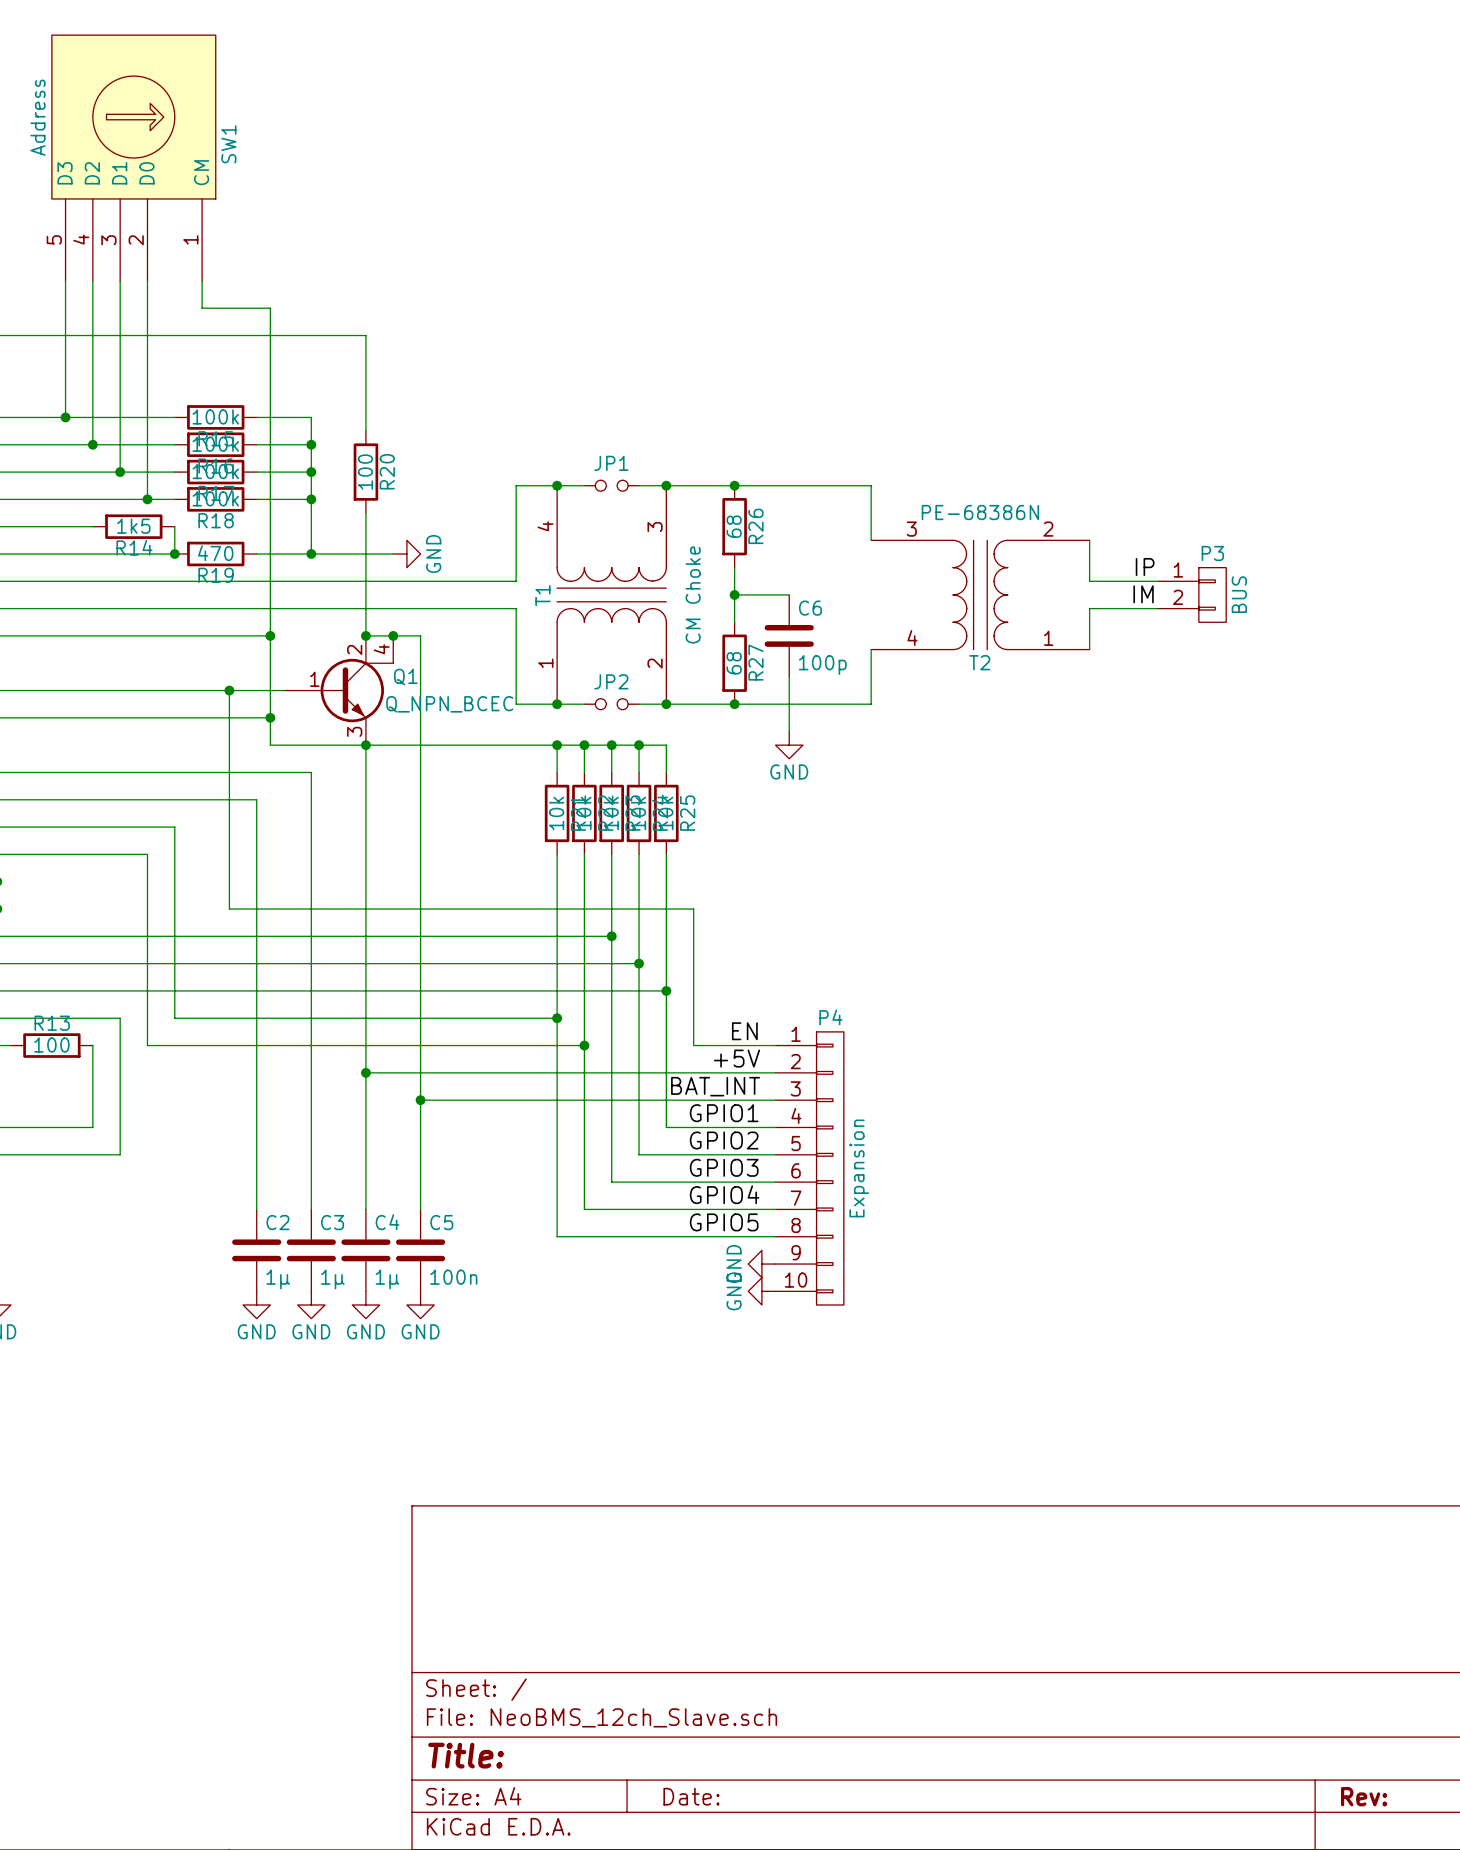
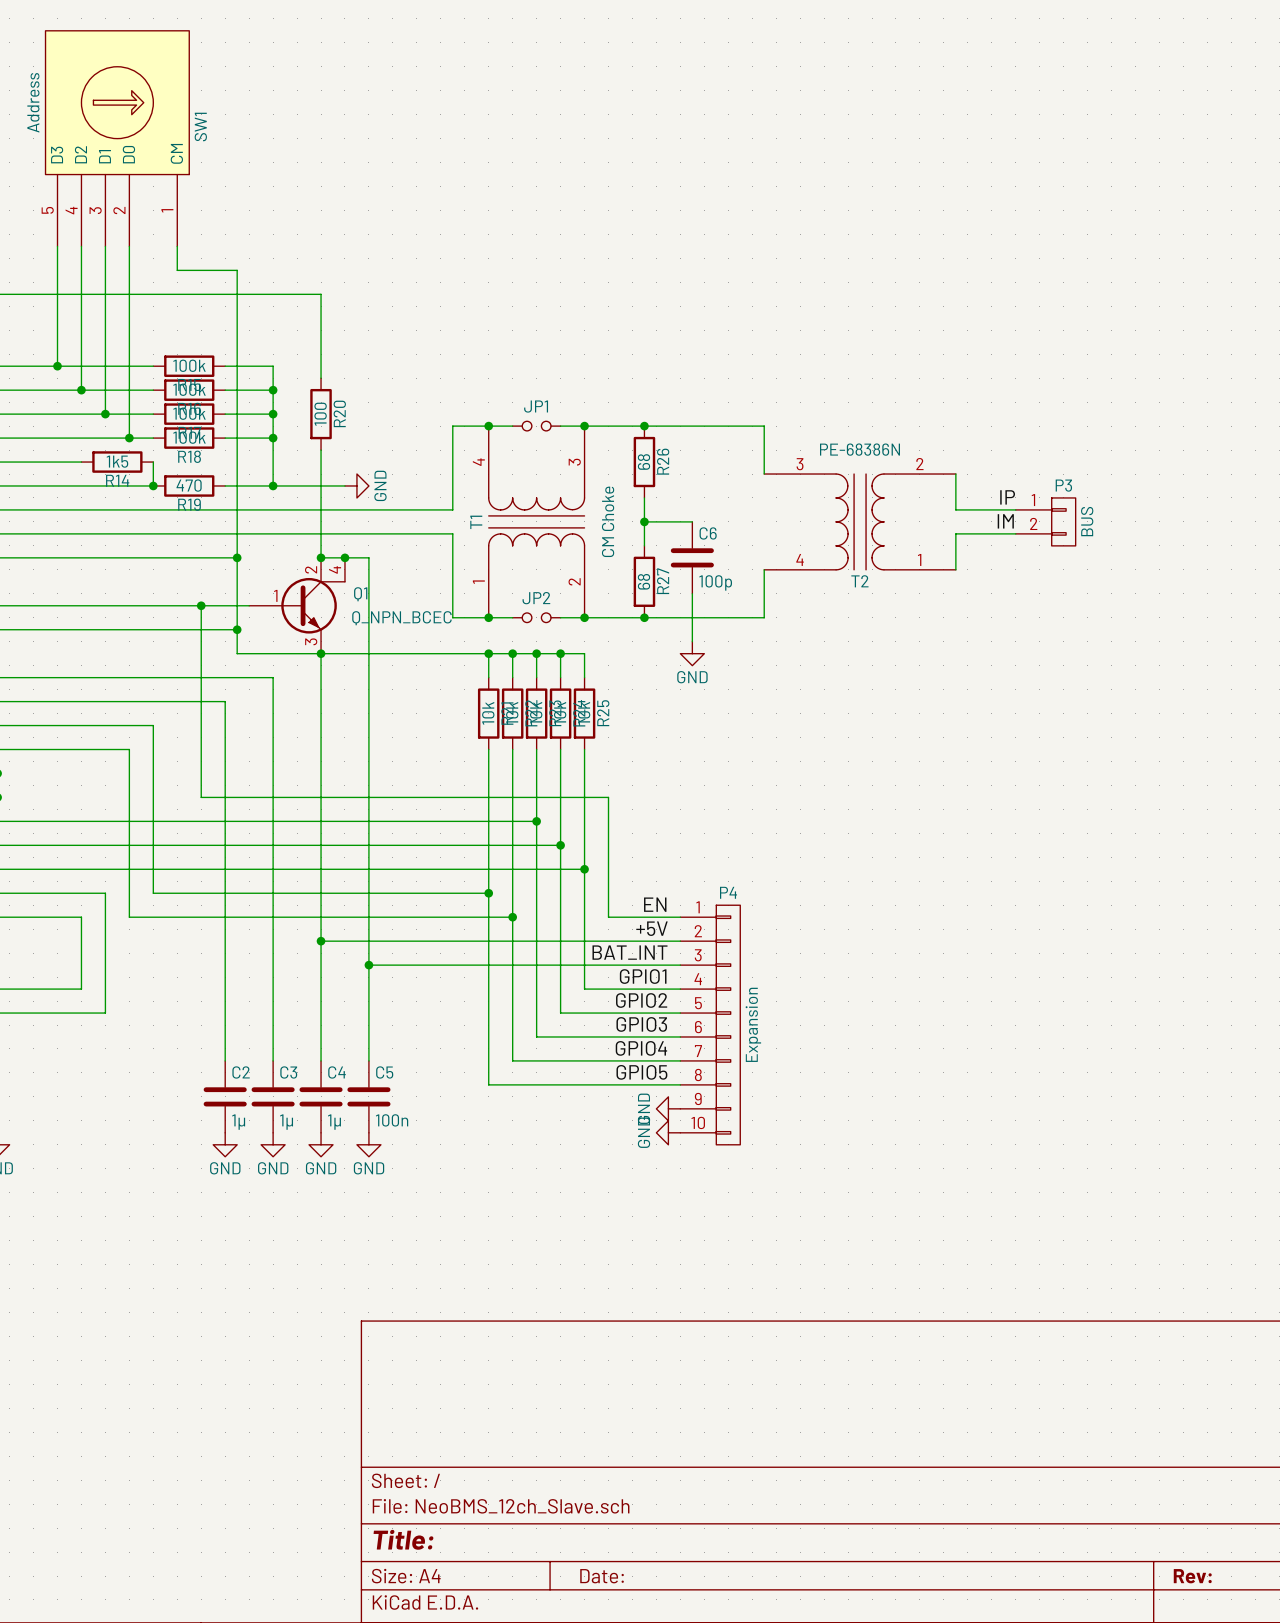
wire: none -> (9, 917) (81, 917)
R13: 100 (51, 1045) -> none

